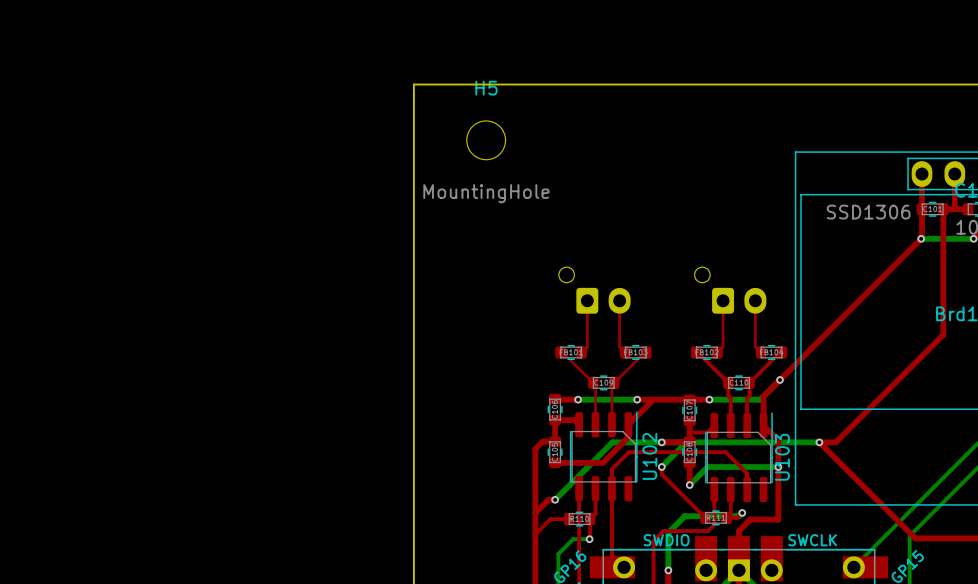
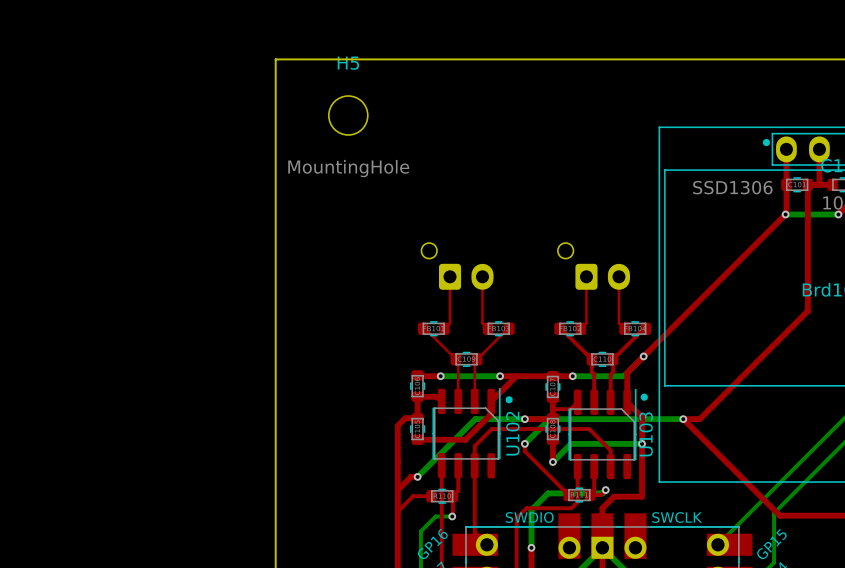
drawing: none -> [762, 138, 771, 147]
drawing: none -> [640, 393, 648, 401]
drawing: none -> [505, 396, 513, 404]

